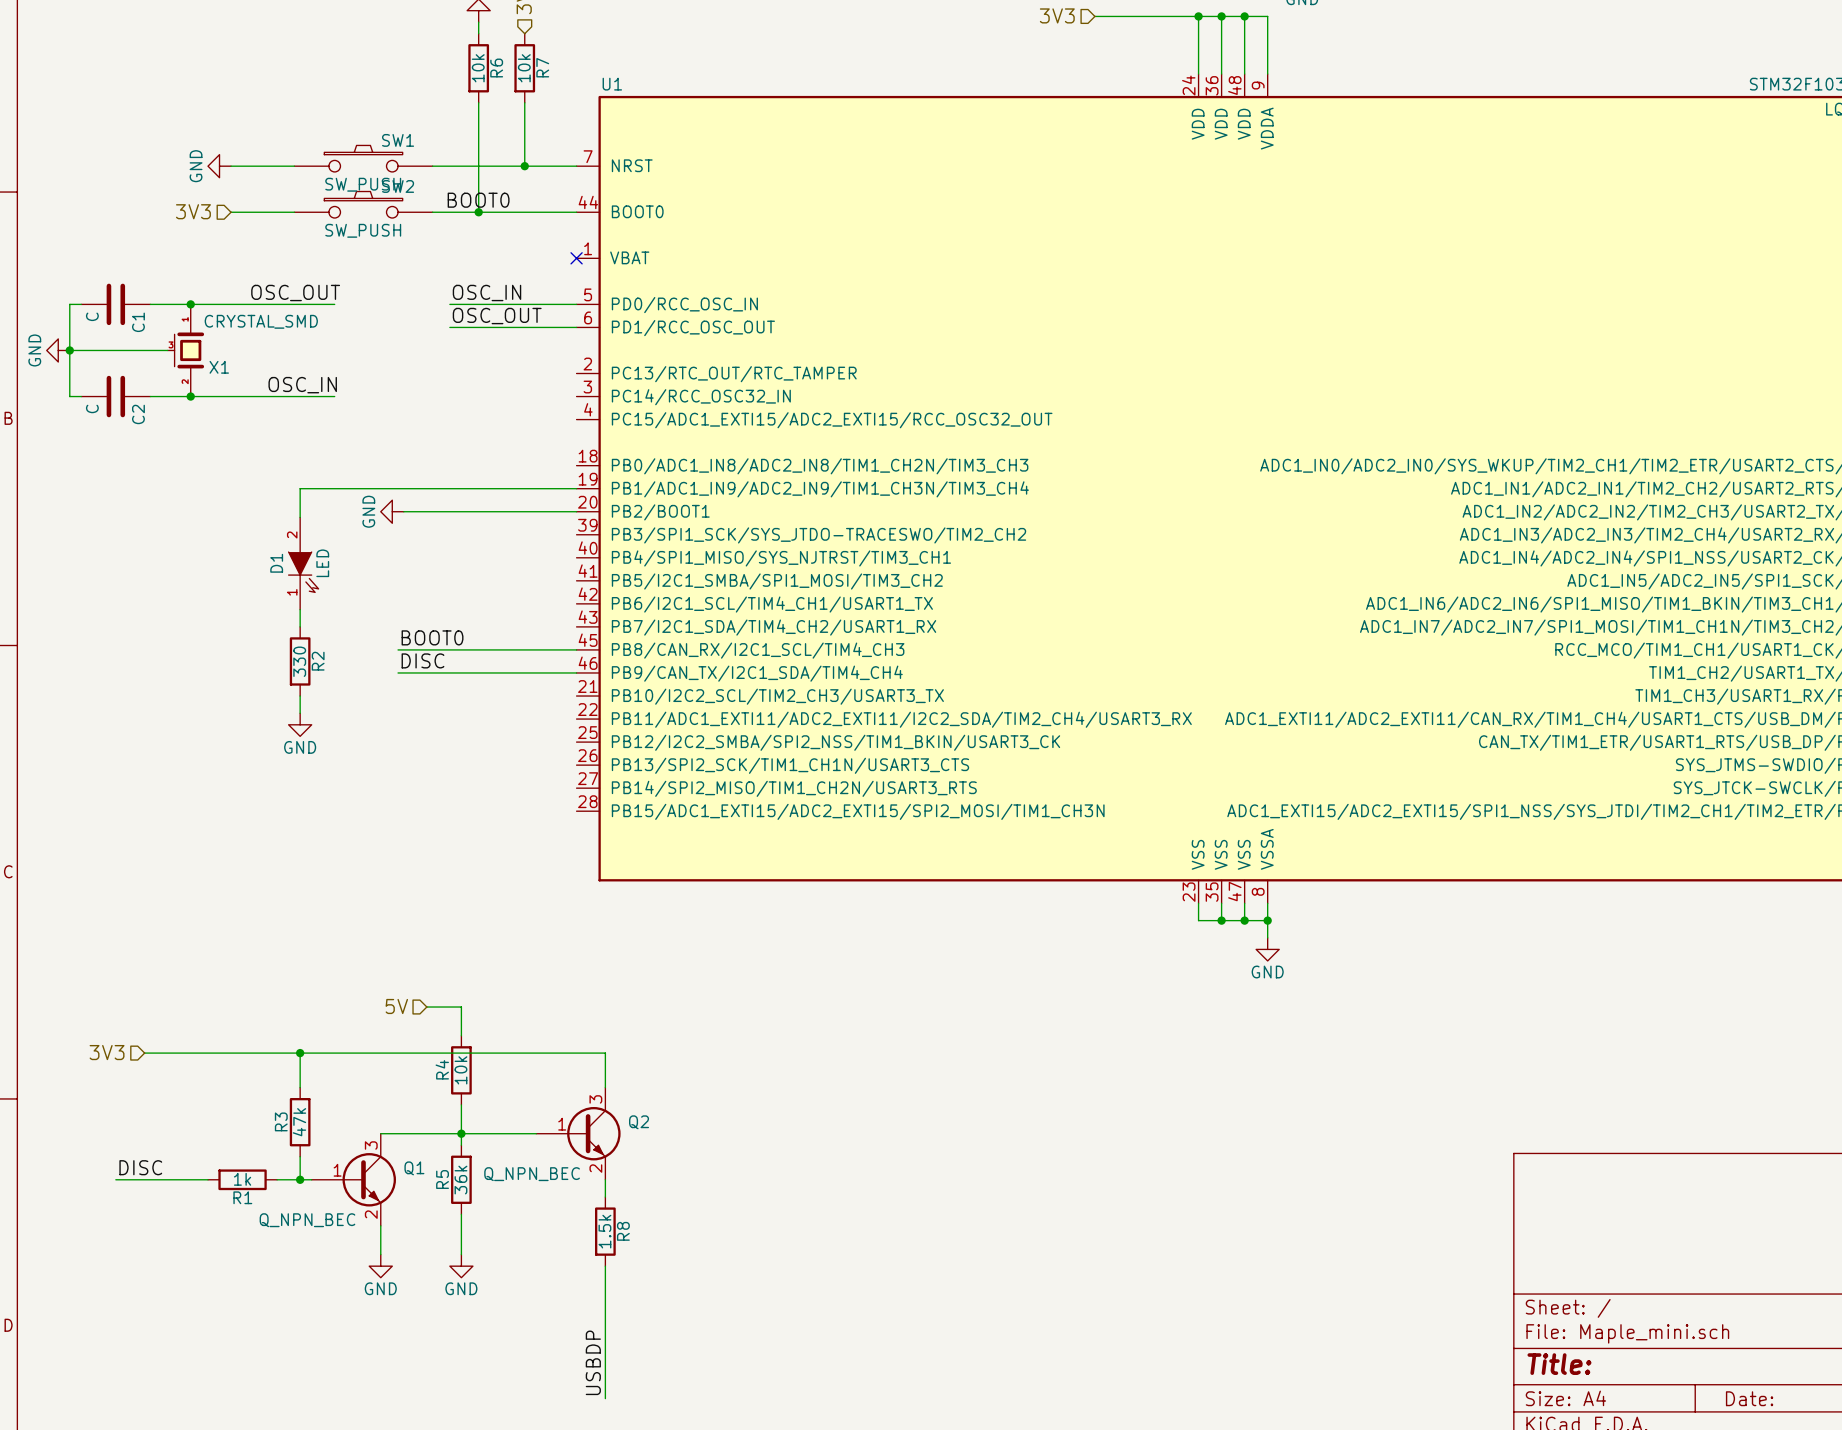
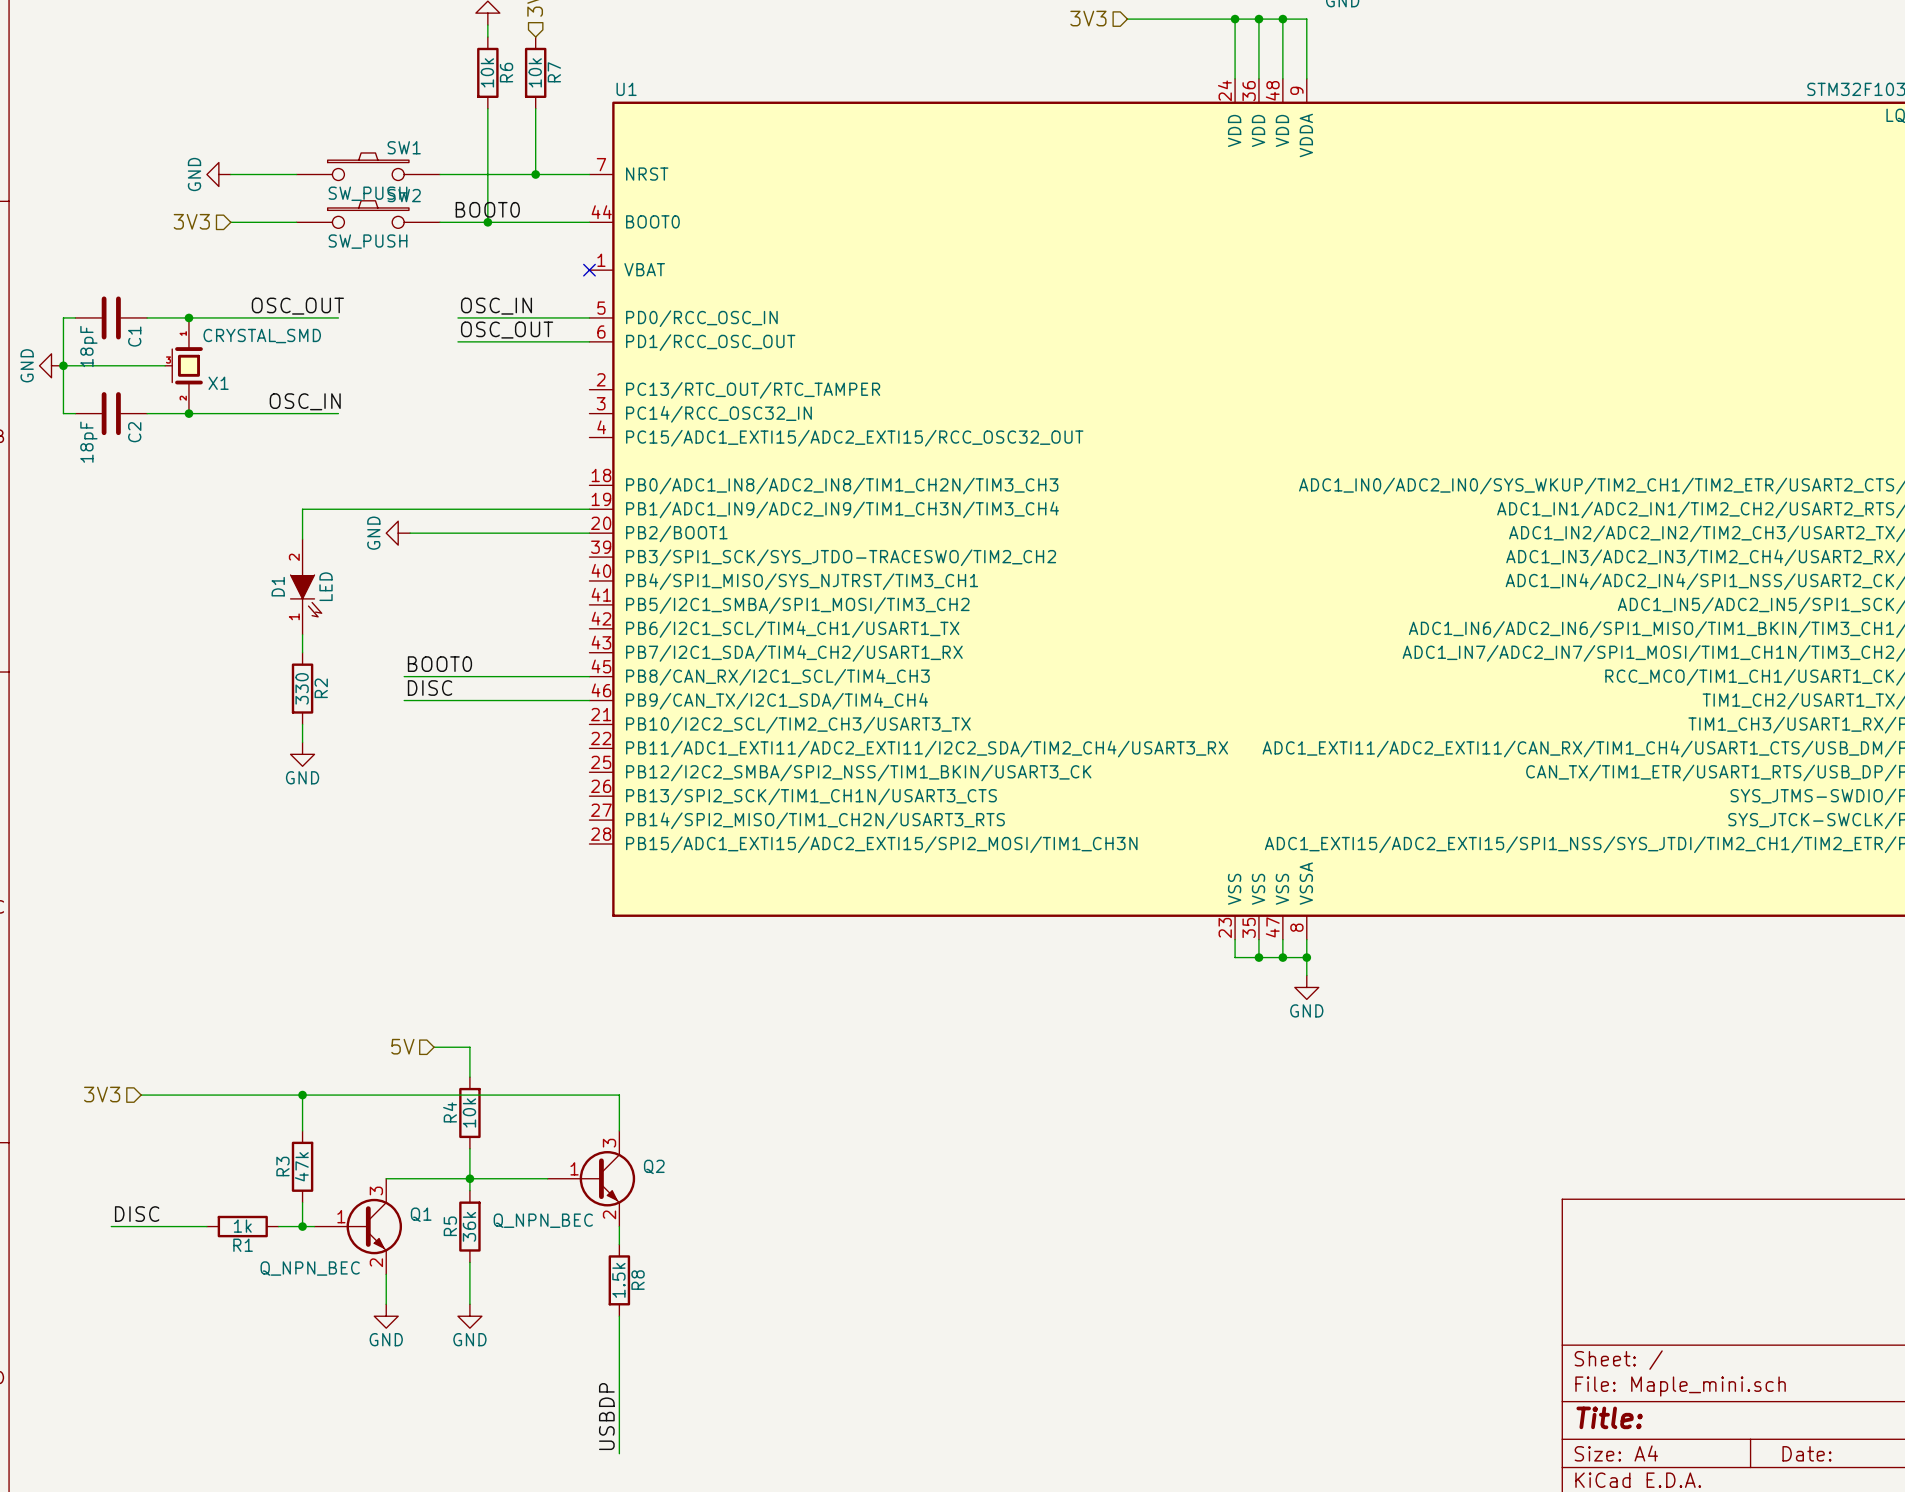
C1 value: C (92, 316) -> 18pF (88, 346)
C2 value: C (92, 408) -> 18pF (88, 442)

